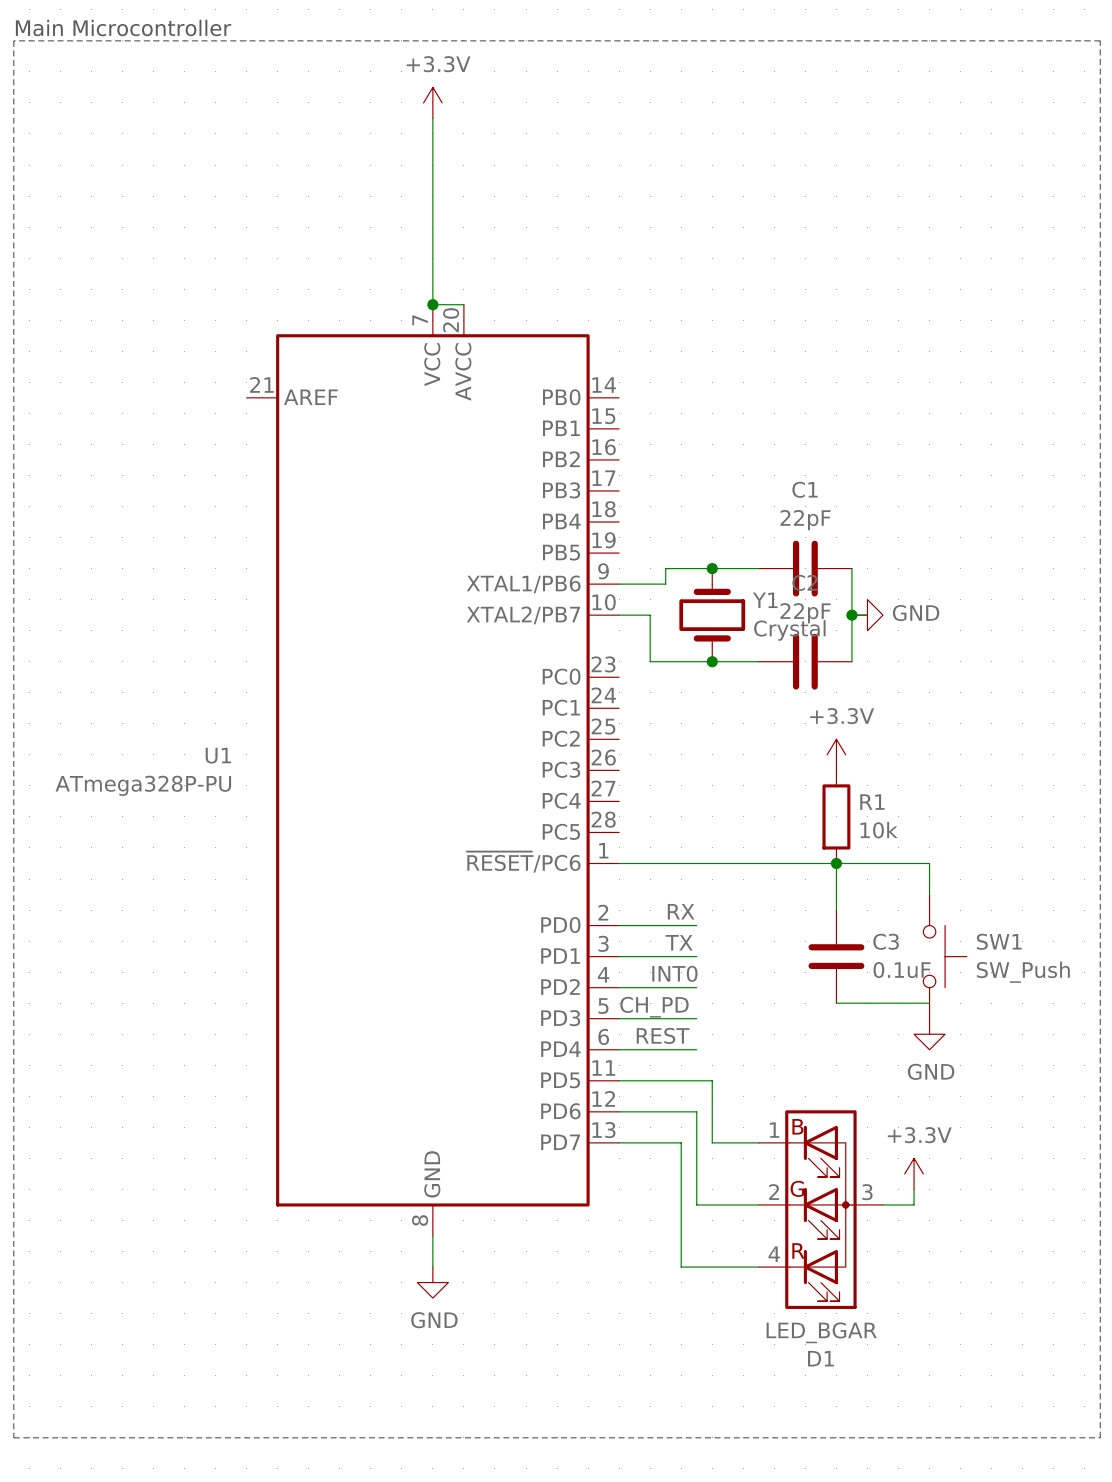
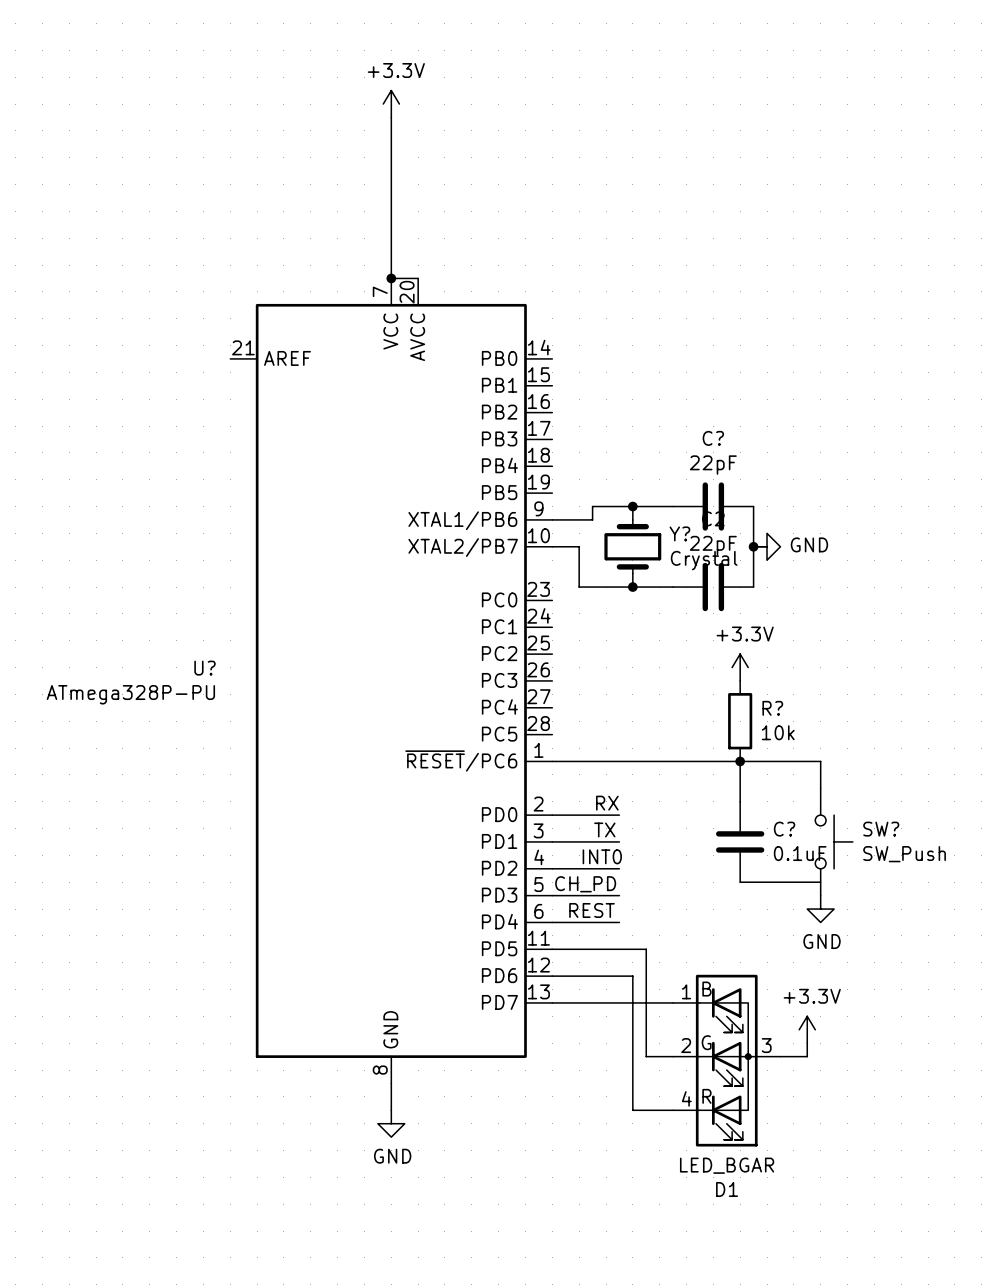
text: Main Microcontroller (123, 27) -> none
line: (13, 40) (13, 1437) (1100, 1437) (1100, 40) (13, 40) -> none
C1 name: C1 (805, 489) -> C? (713, 438)
Y1 name: Y1 (765, 600) -> Y? (679, 533)
U1 name: U1 (218, 755) -> U? (204, 668)
R1 name: R1 (872, 802) -> R? (772, 708)
C3 name: C3 (886, 941) -> C? (784, 829)
SW1 name: SW1 (999, 941) -> SW? (881, 829)
wire: (712, 1080) (712, 1111) -> (619, 976) (632, 976)
wire: (696, 1111) (696, 1204) (727, 1204) -> (632, 949) (646, 949) (646, 1056)
wire: (681, 1142) (681, 1267) (712, 1267) -> (606, 1002) (632, 1002) (632, 1110)

